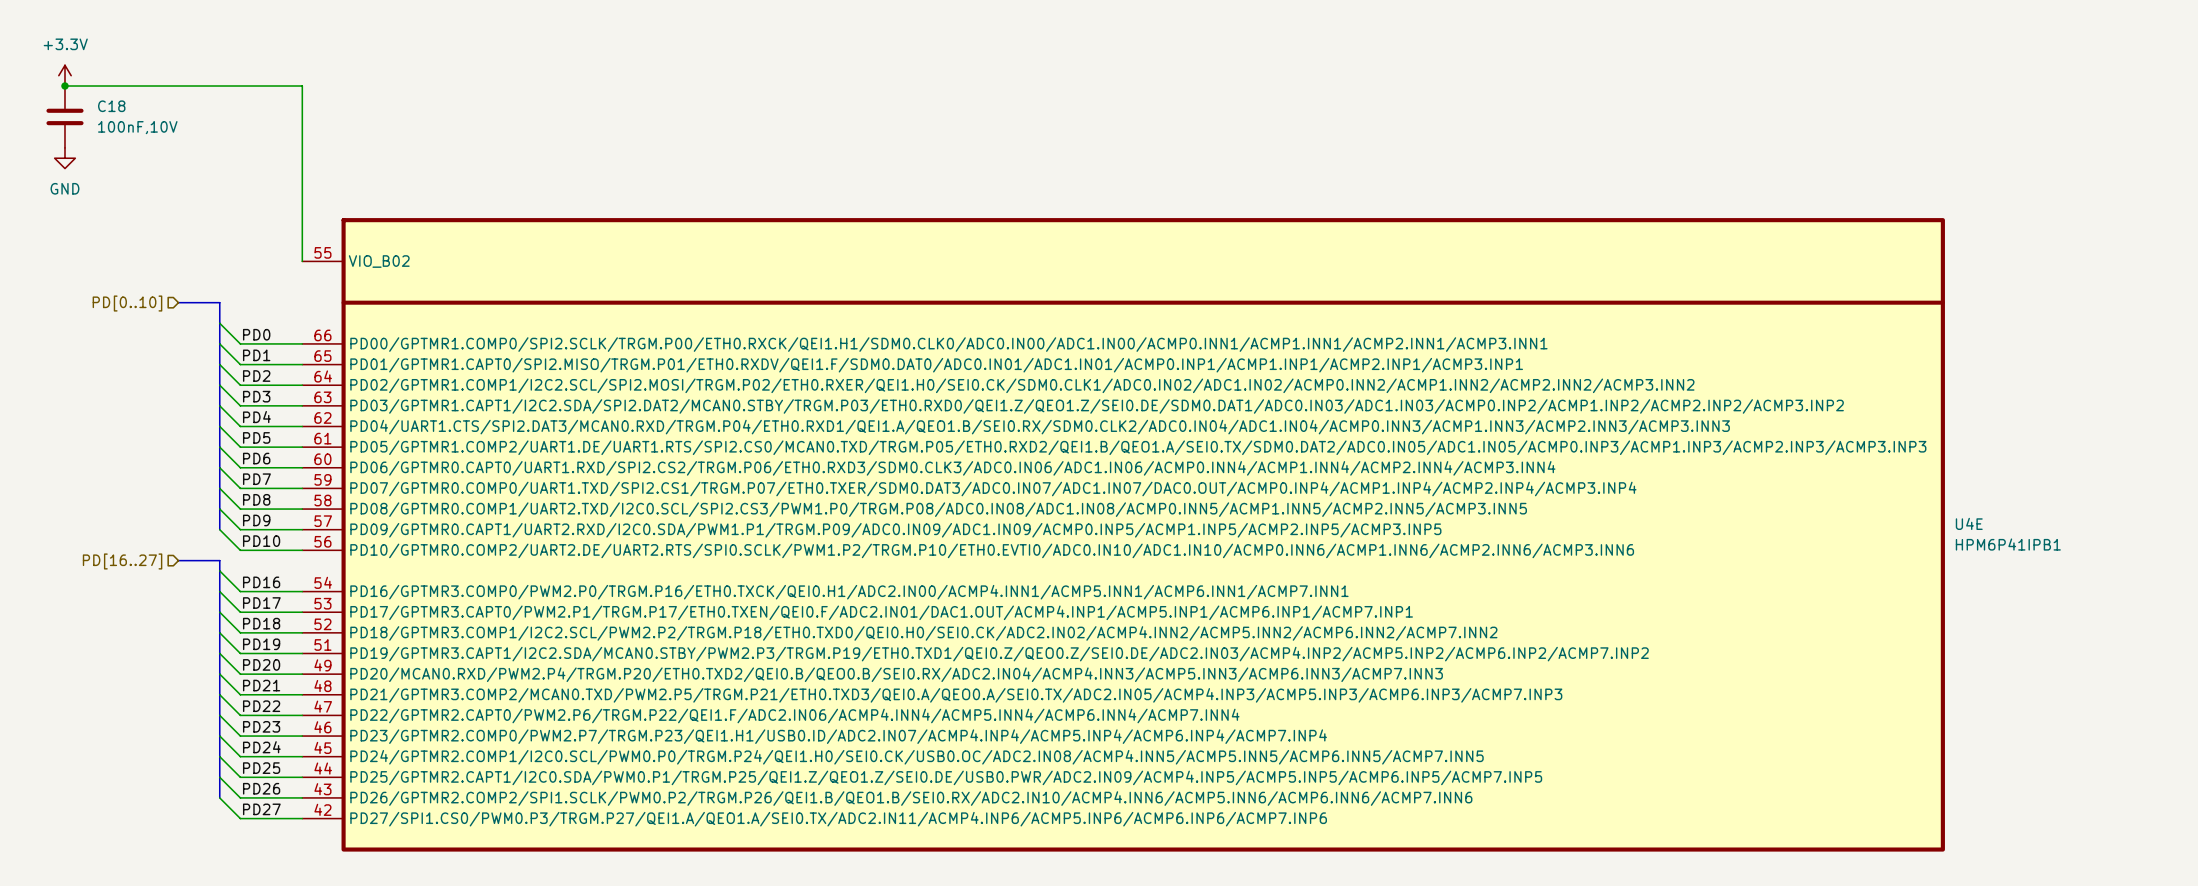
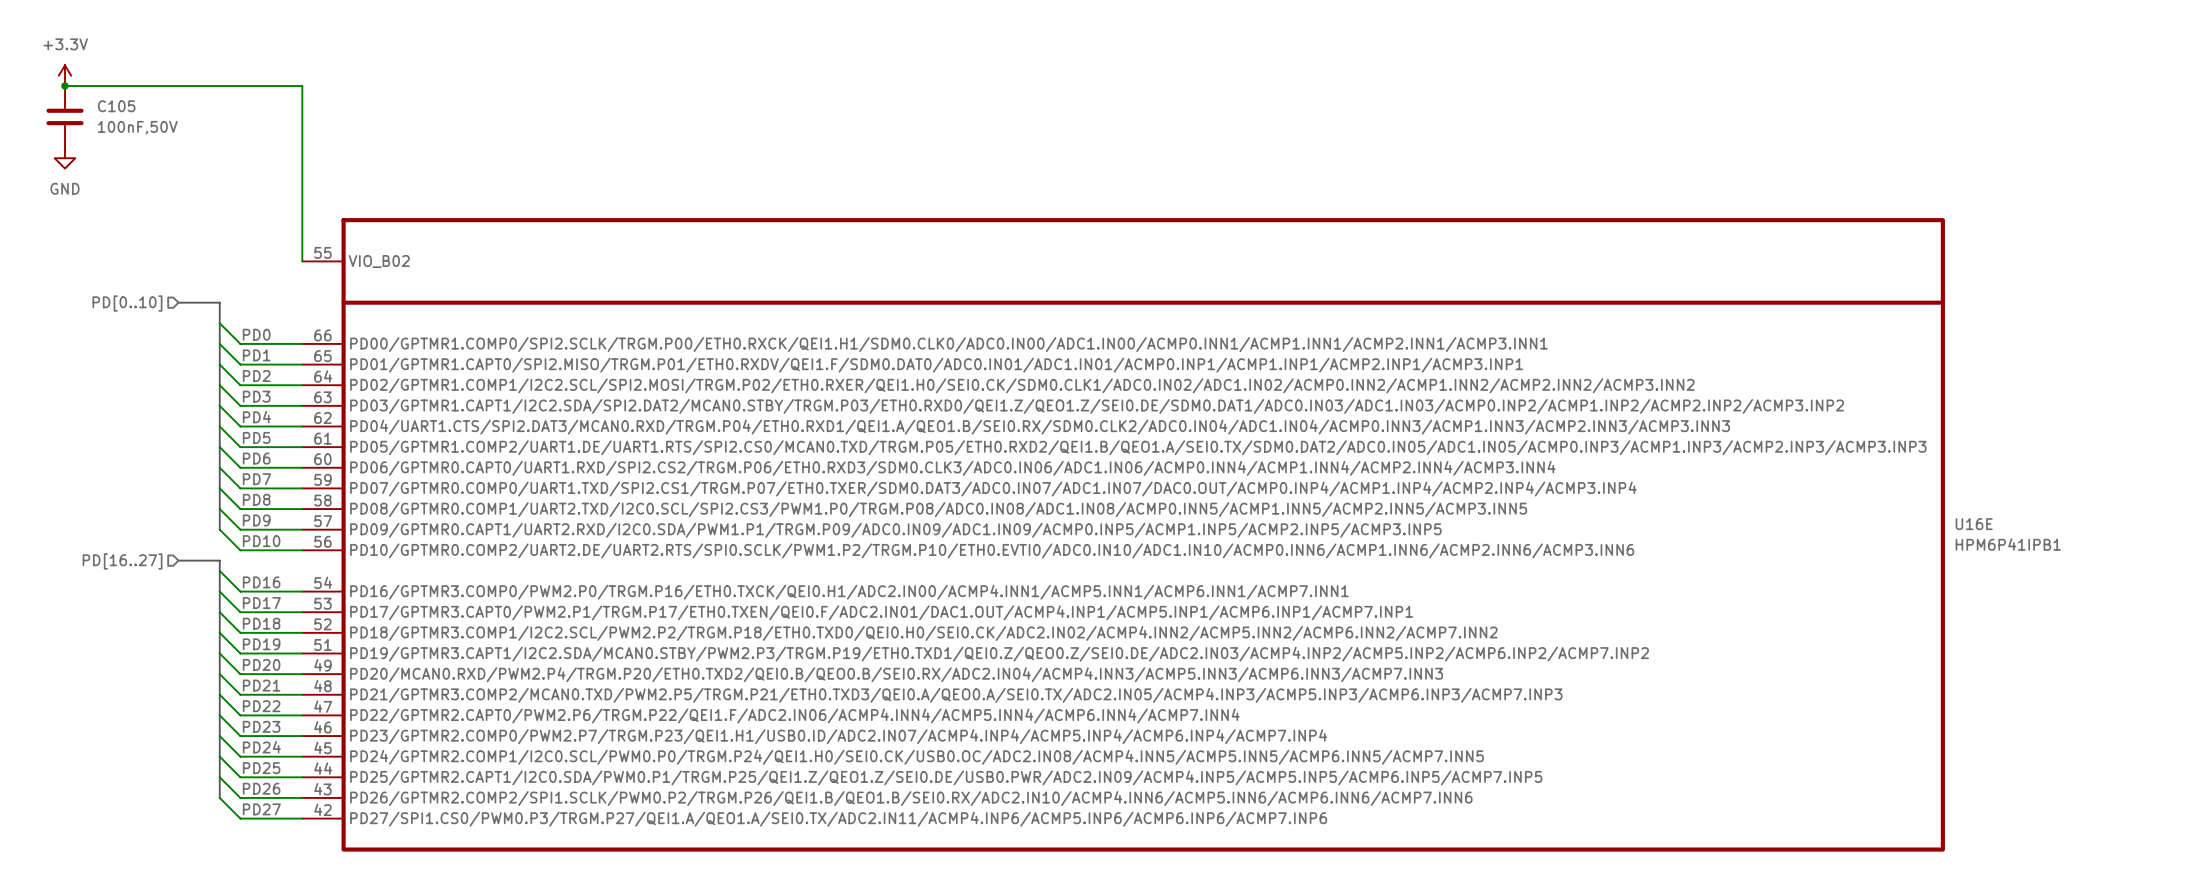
C18 name: C18 (111, 106) -> C105 (116, 106)
C18 value: 100nF,10V (137, 127) -> 100nF,50V (137, 127)
U4E name: U4E (1969, 523) -> U16E (1974, 524)

